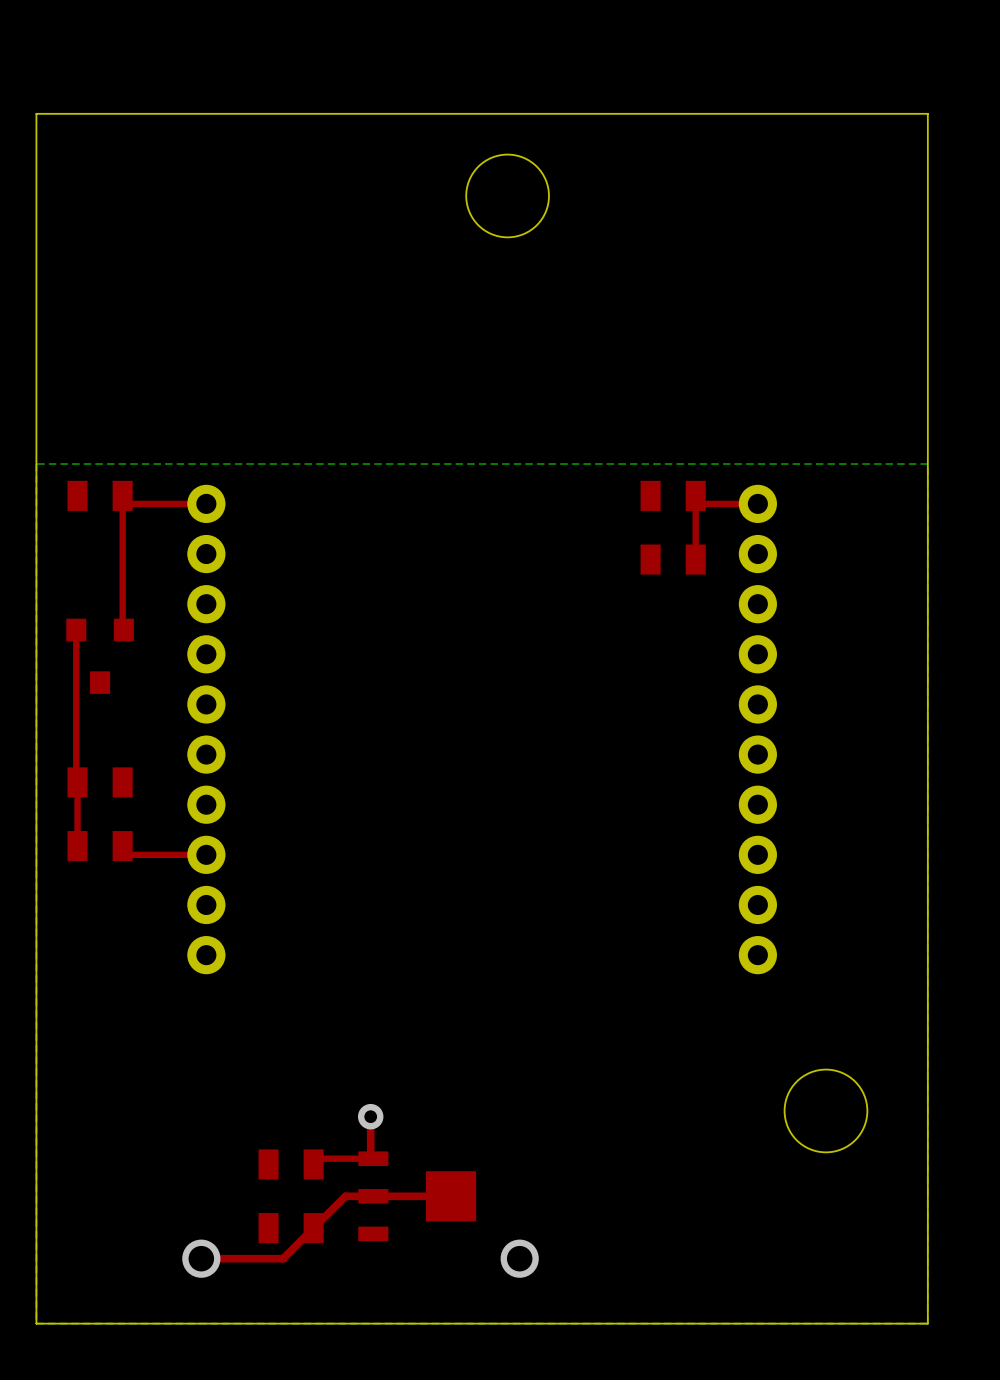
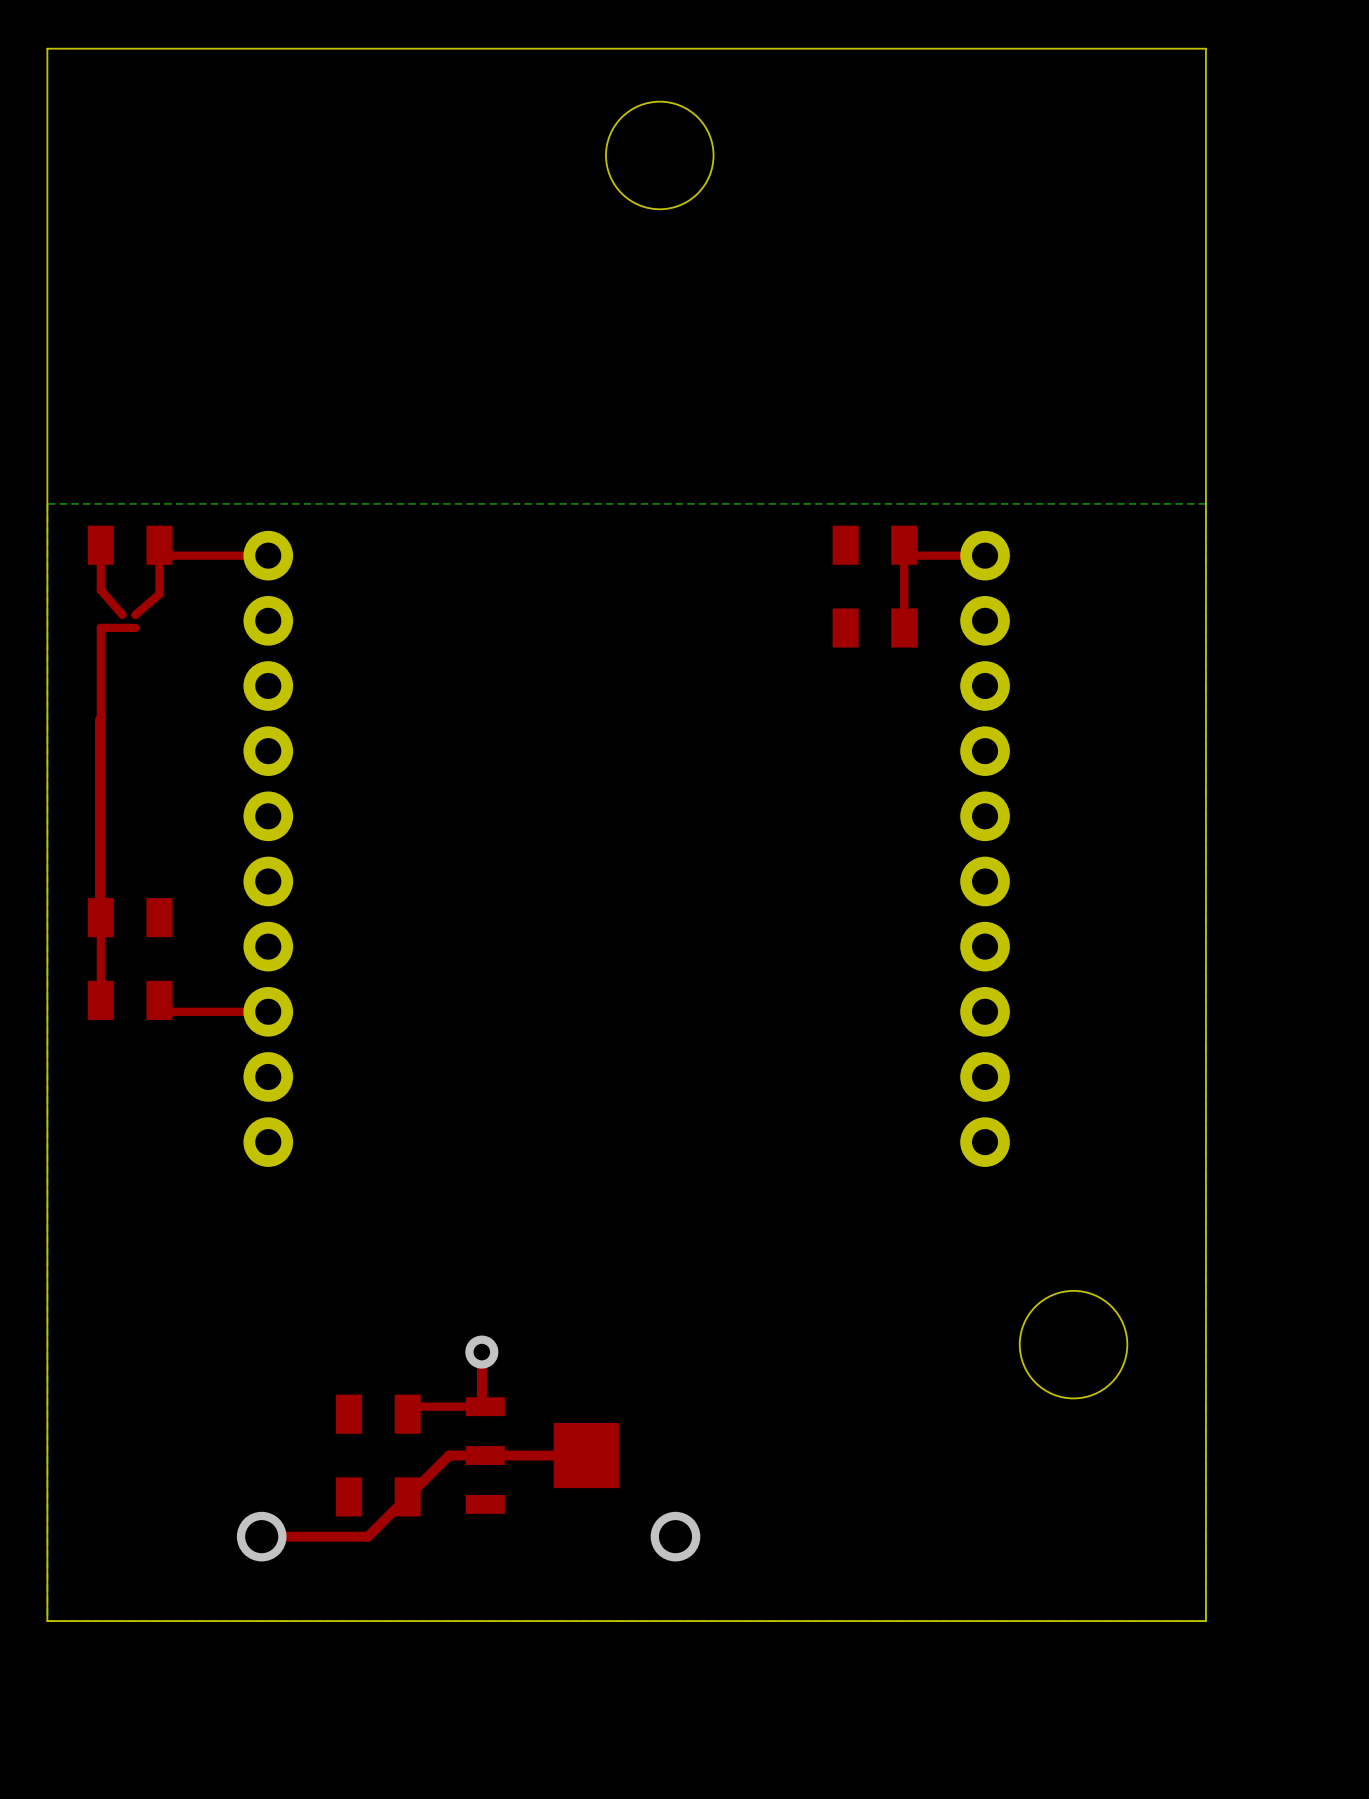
top track: none -> (100, 545) (100, 590) (122, 614)
top track: (122, 533) (123, 629) -> (159, 594) (135, 614)
top track: none -> (135, 627) (100, 627) (100, 917)
part: (100, 656) -> none

